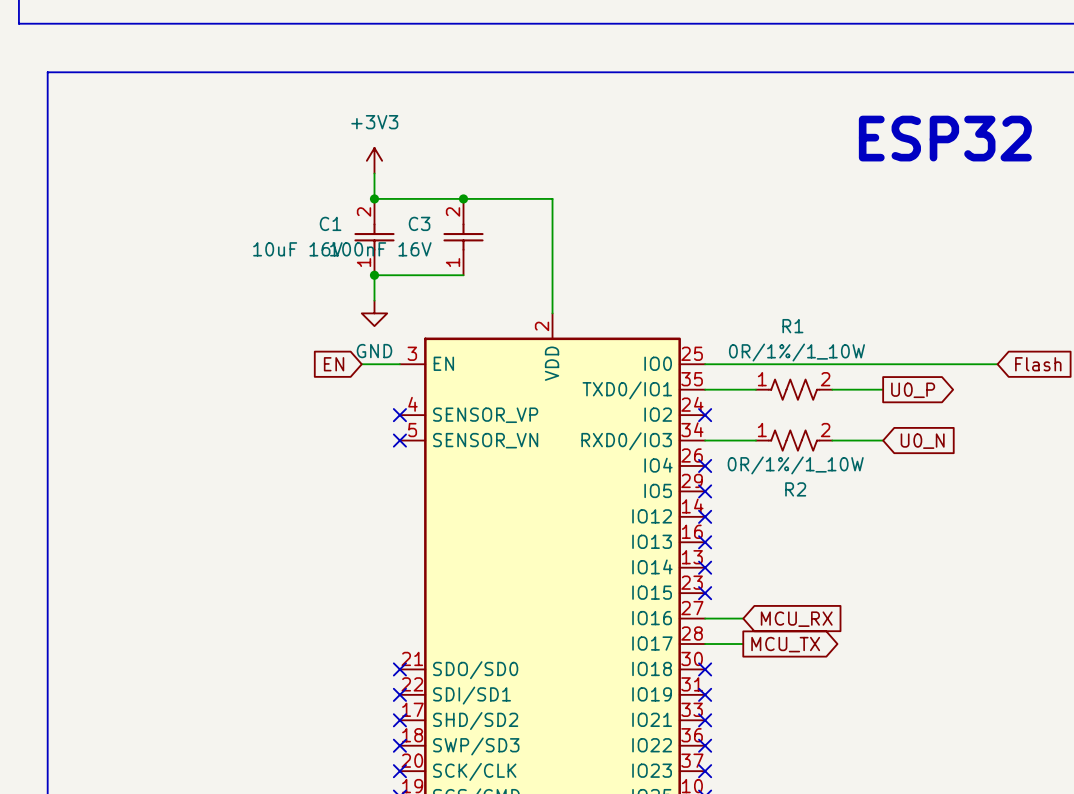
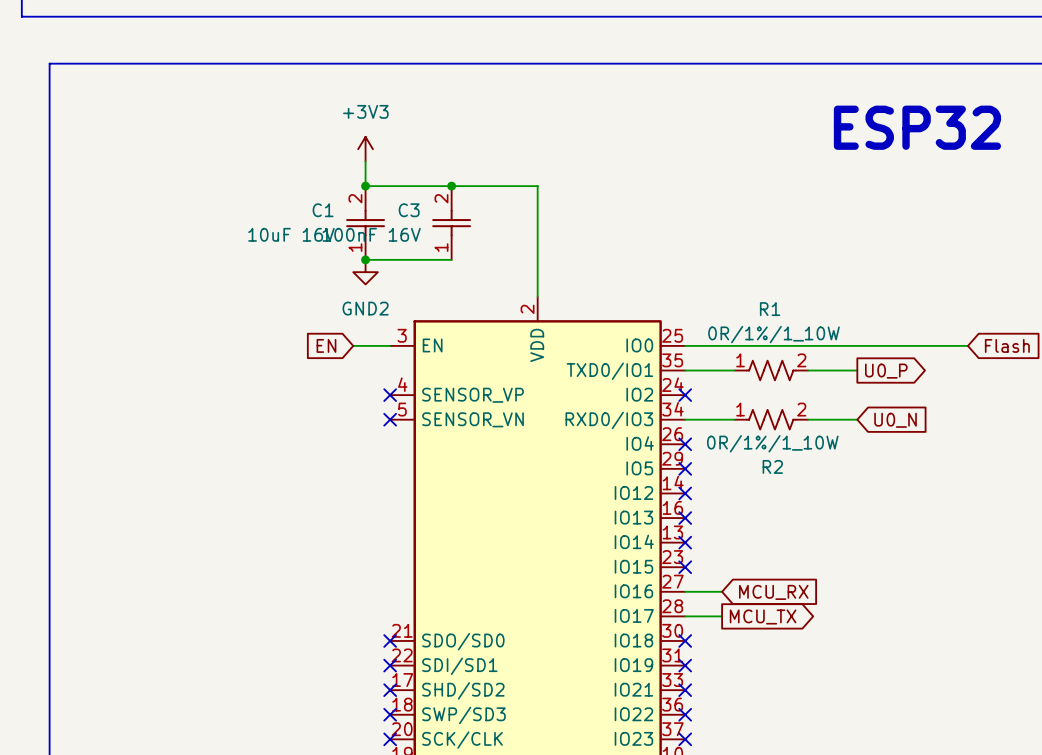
power symbol: none -> GND2 (365, 272)
power symbol: GND (374, 313) -> none

